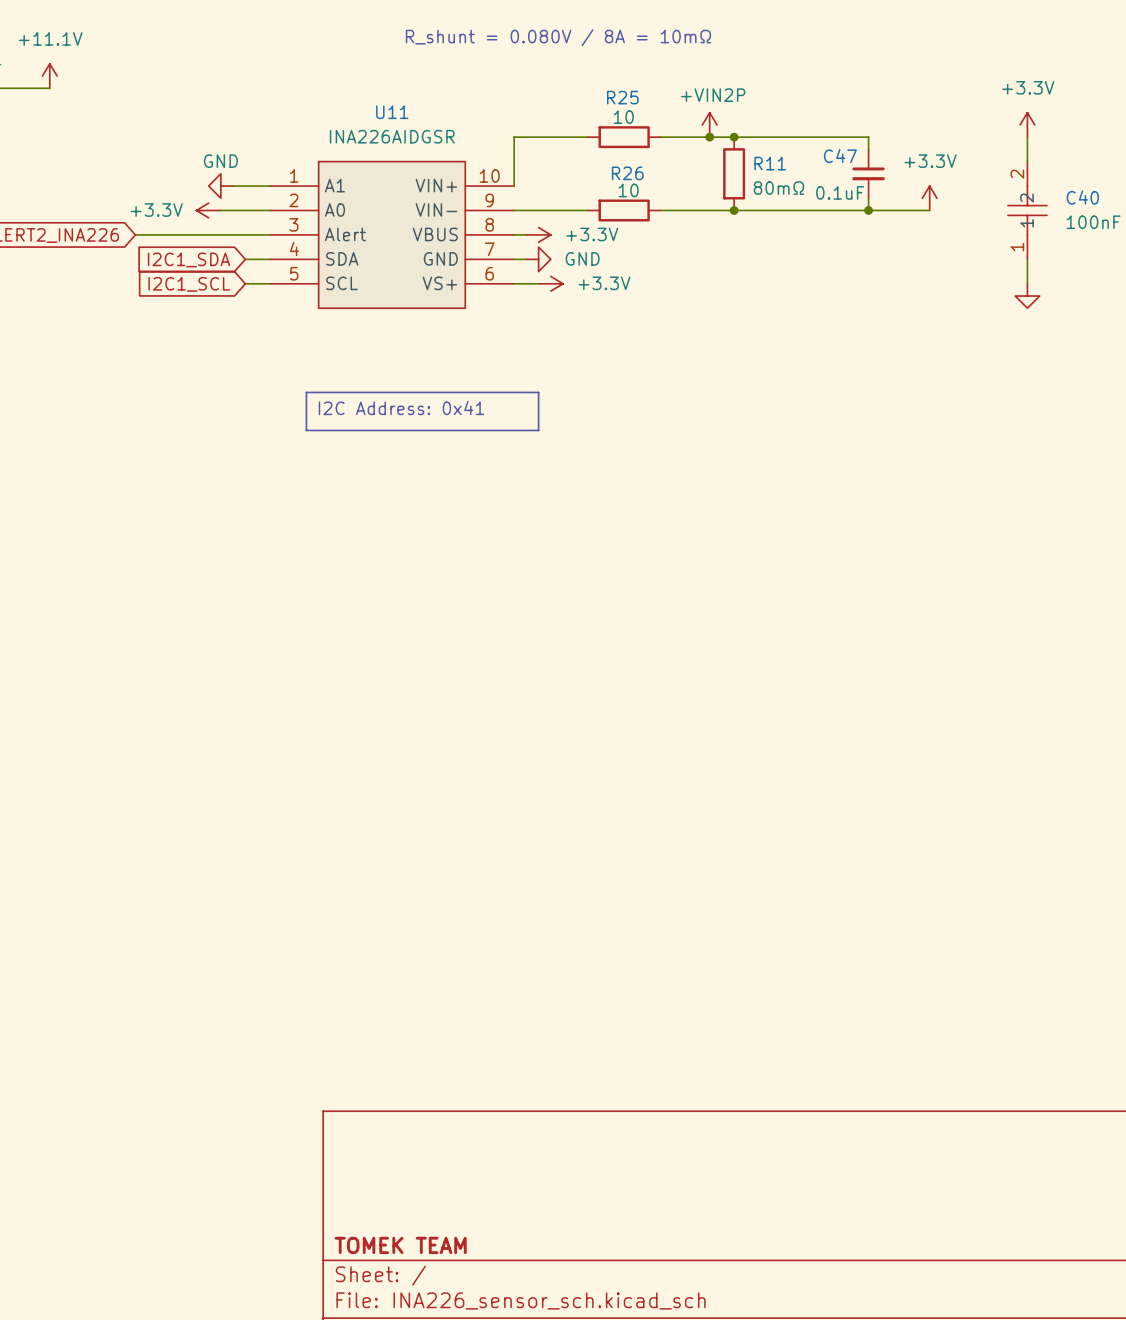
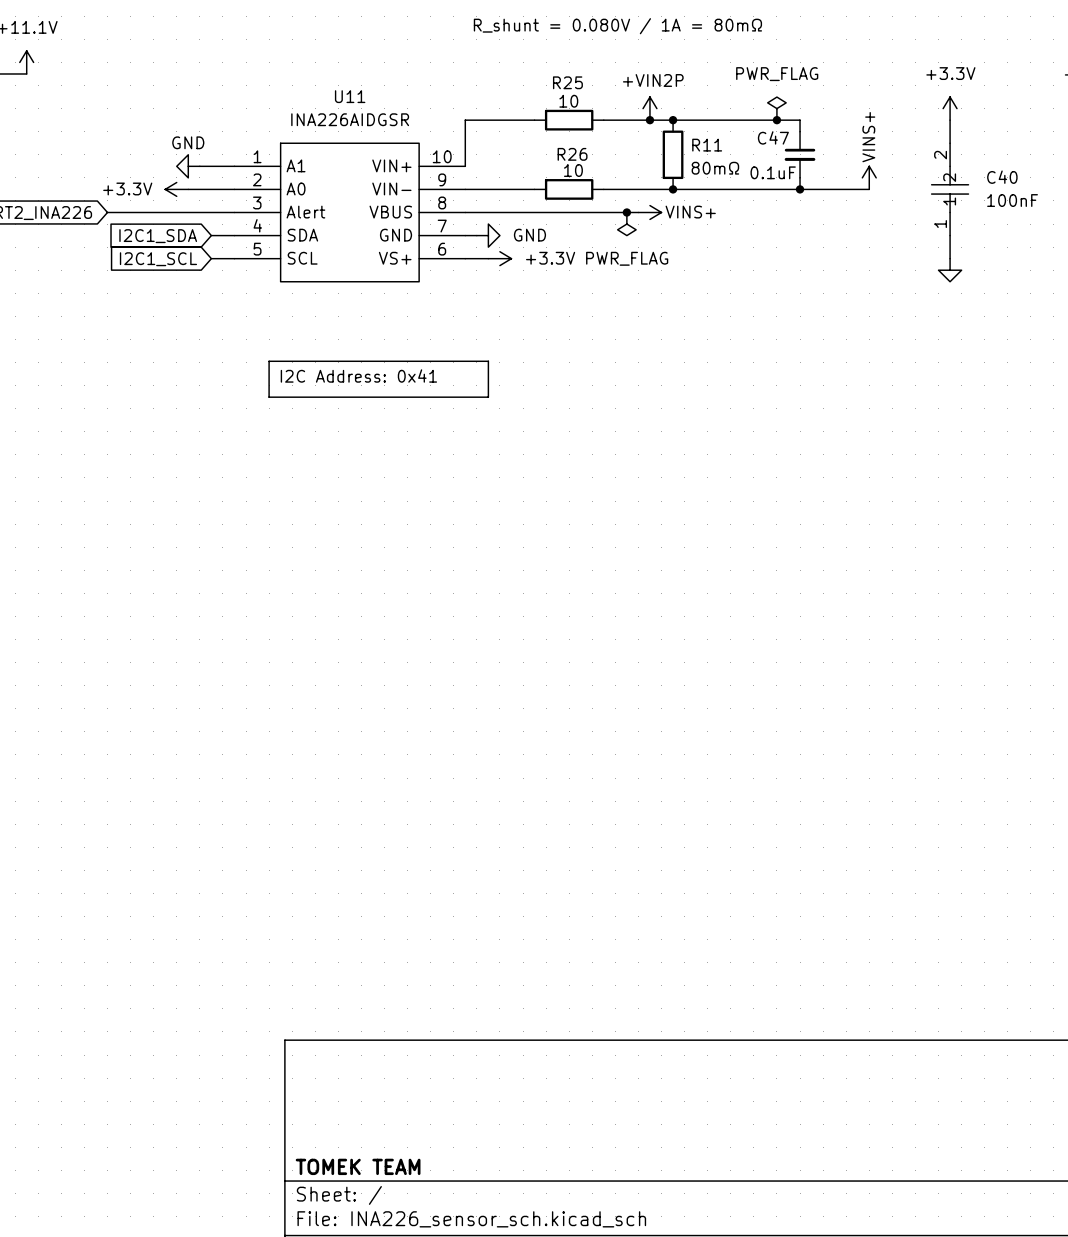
text: R_shunt = 0.080V / 8A = 10mΩ (558, 37) -> R_shunt = 0.080V / 1A = 80mΩ (617, 26)
power symbol: none -> PWR_FLAG (776, 108)
junction: none -> (776, 120)
power symbol: +3.3V (929, 198) -> none
power symbol: none -> VINS+ (869, 177)
wire: none -> (857, 189) (869, 189)
wire: none -> (476, 212) (638, 212)
power symbol: +3.3V (538, 234) -> none
junction: none -> (626, 212)
power symbol: none -> VINS+ (649, 212)
power symbol: none -> PWR_FLAG (626, 224)

